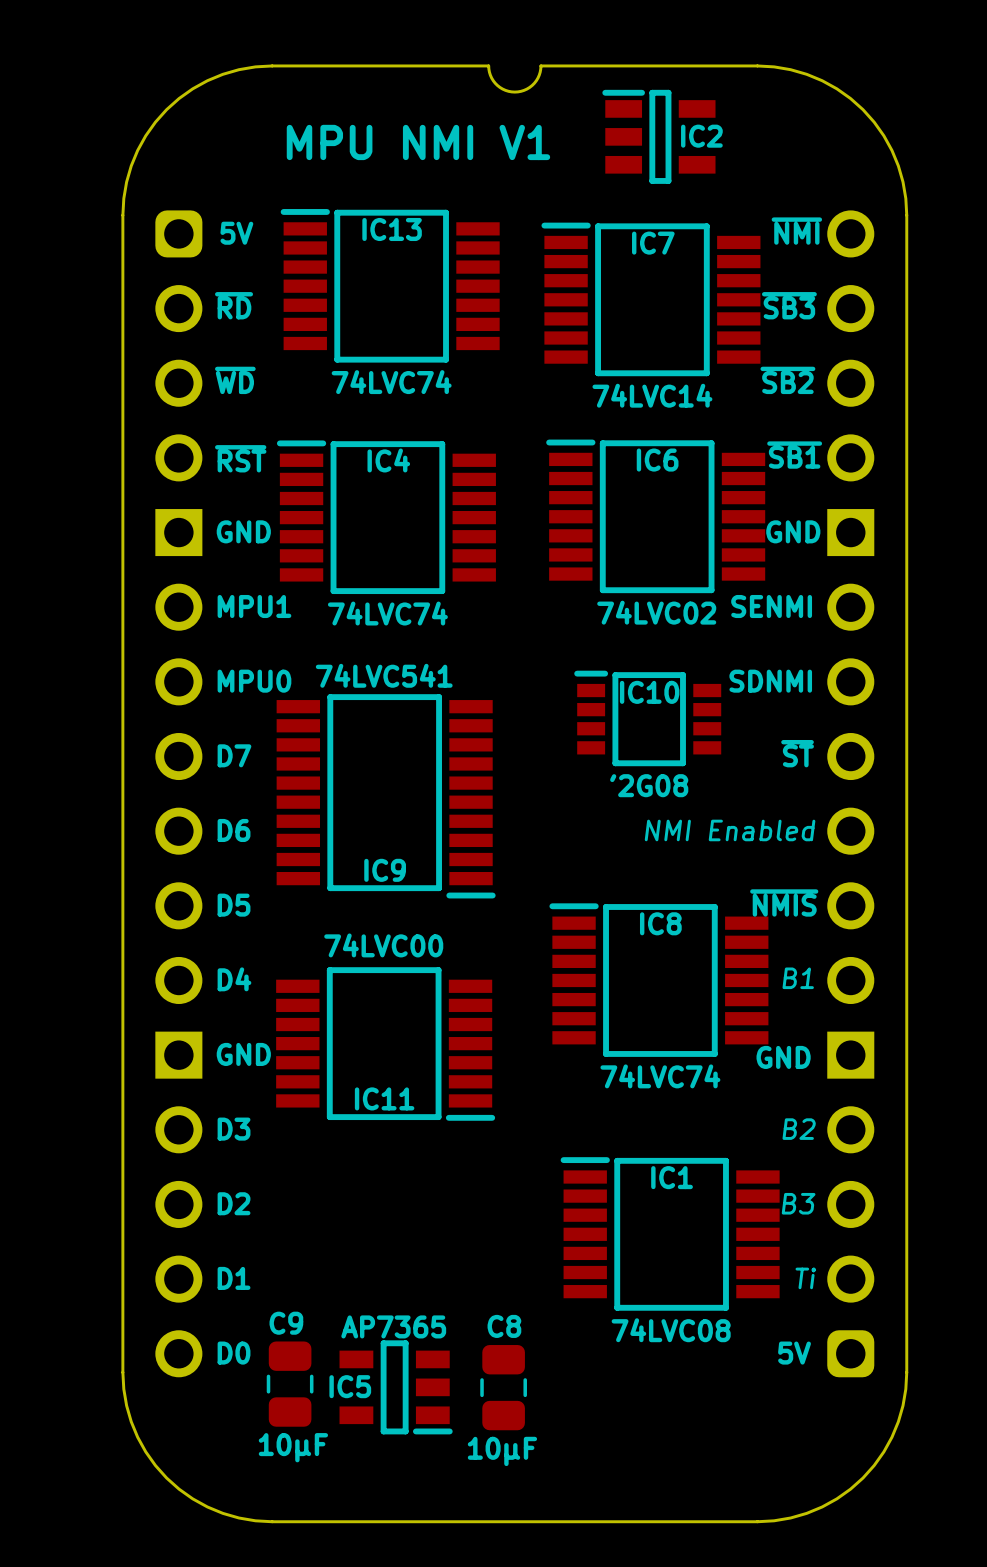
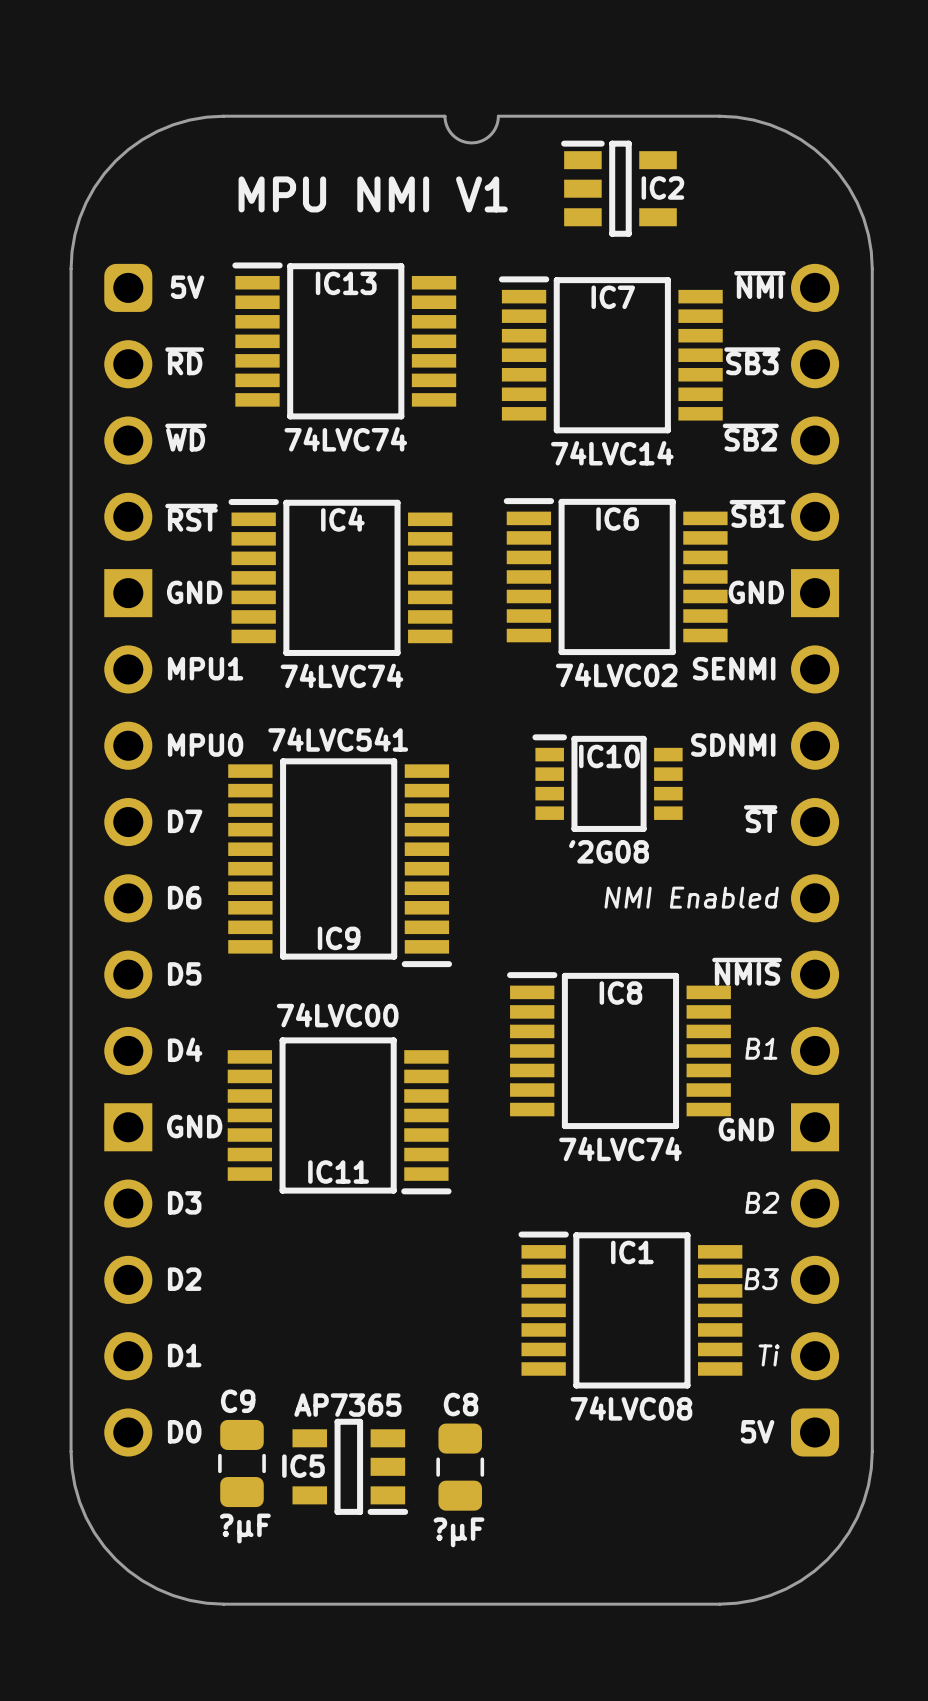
C9 value: 10μF (293, 1447) -> ?μF (245, 1528)
C8 value: 10μF (502, 1451) -> ?μF (459, 1532)

